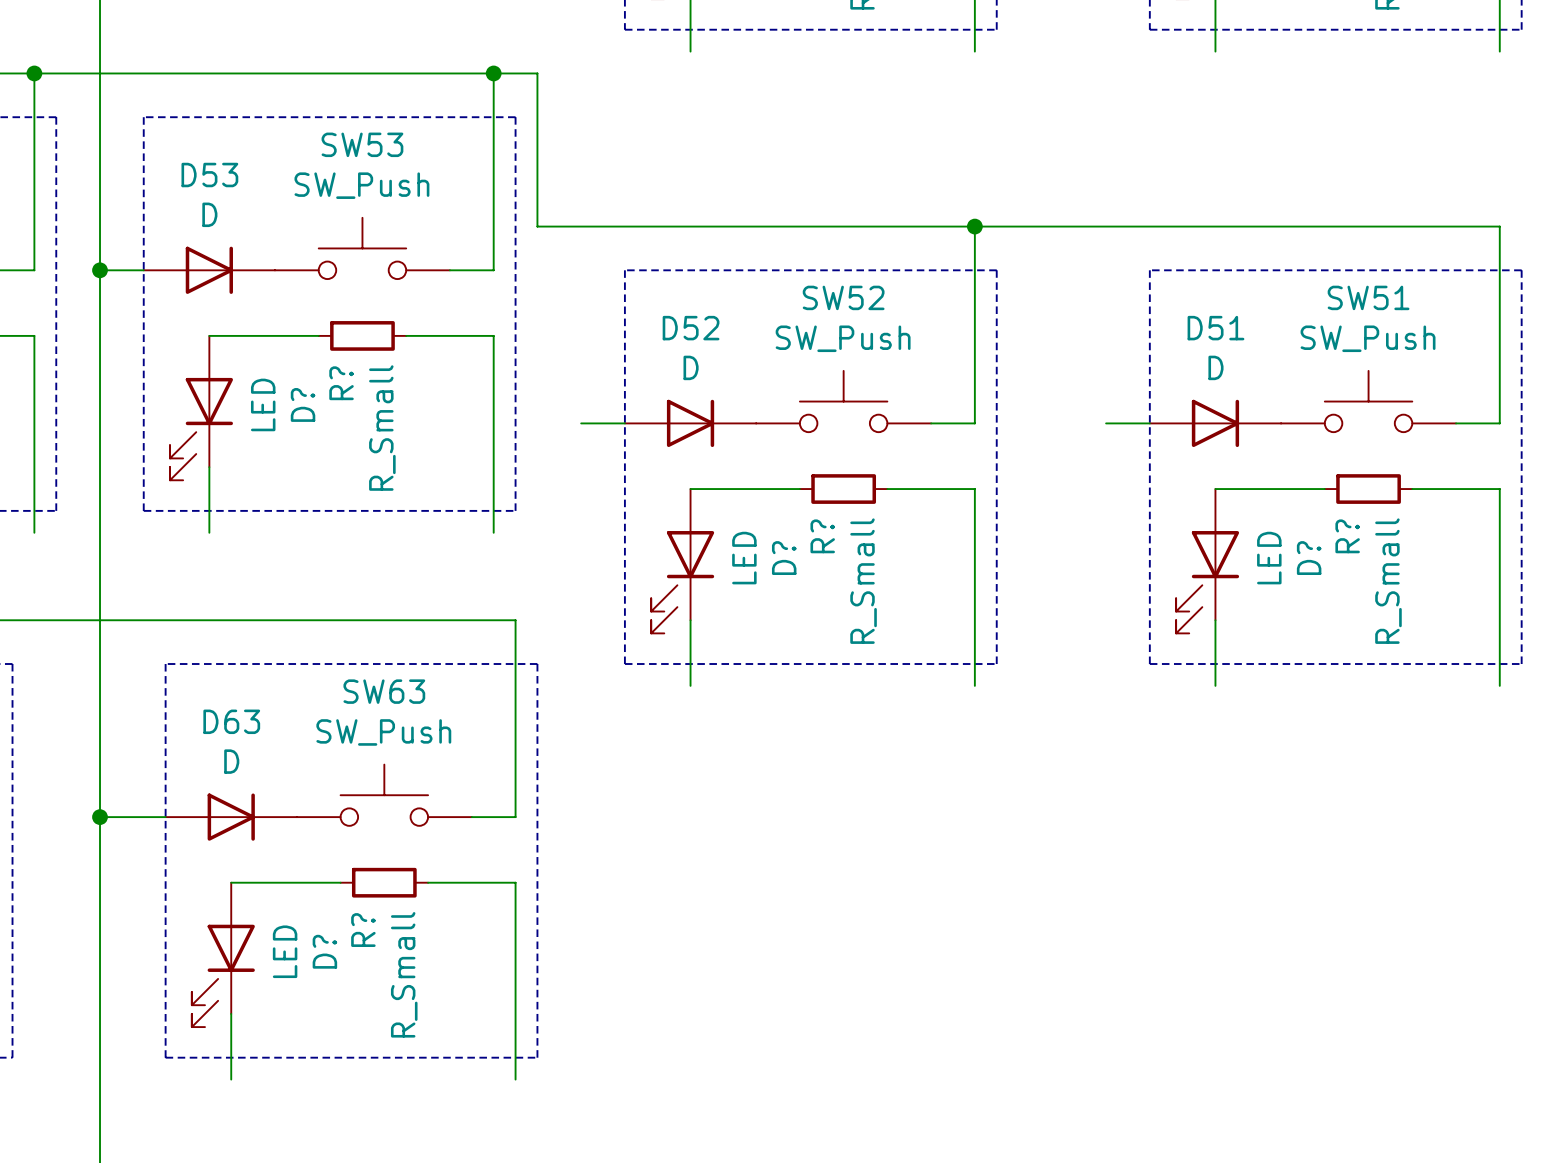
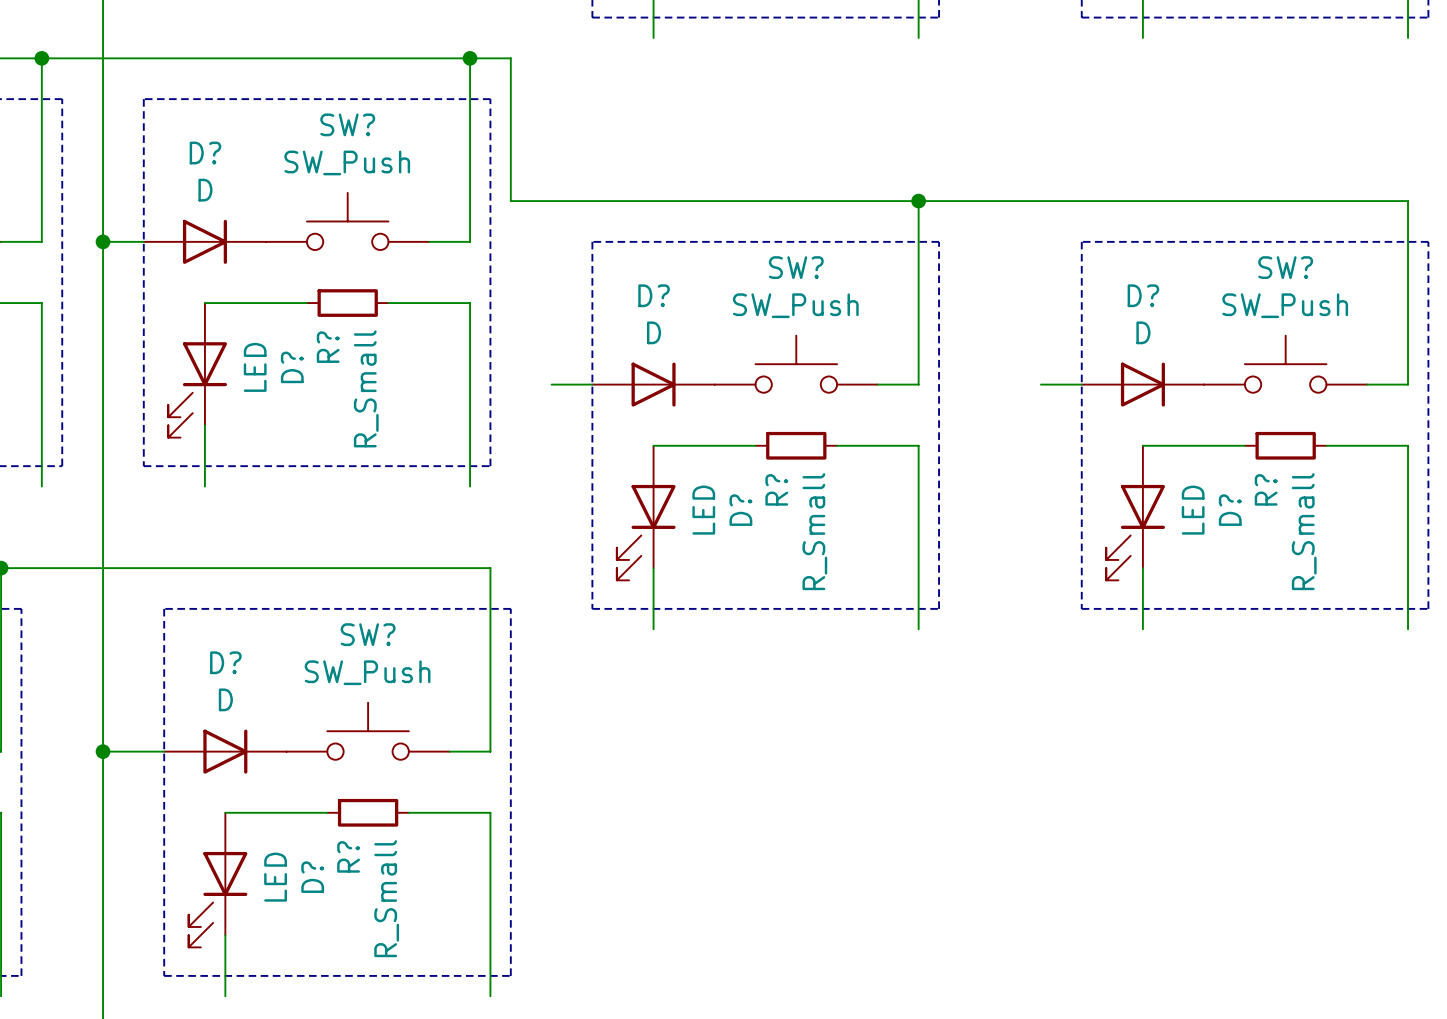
SW53 name: SW53 (362, 144) -> SW? (347, 124)
D53 name: D53 (209, 175) -> D? (205, 153)
SW52 name: SW52 (843, 297) -> SW? (796, 267)
SW51 name: SW51 (1368, 297) -> SW? (1285, 267)
D52 name: D52 (691, 328) -> D? (654, 295)
D51 name: D51 (1215, 328) -> D? (1143, 295)
SW63 name: SW63 (384, 691) -> SW? (368, 634)
D63 name: D63 (231, 721) -> D? (225, 662)

